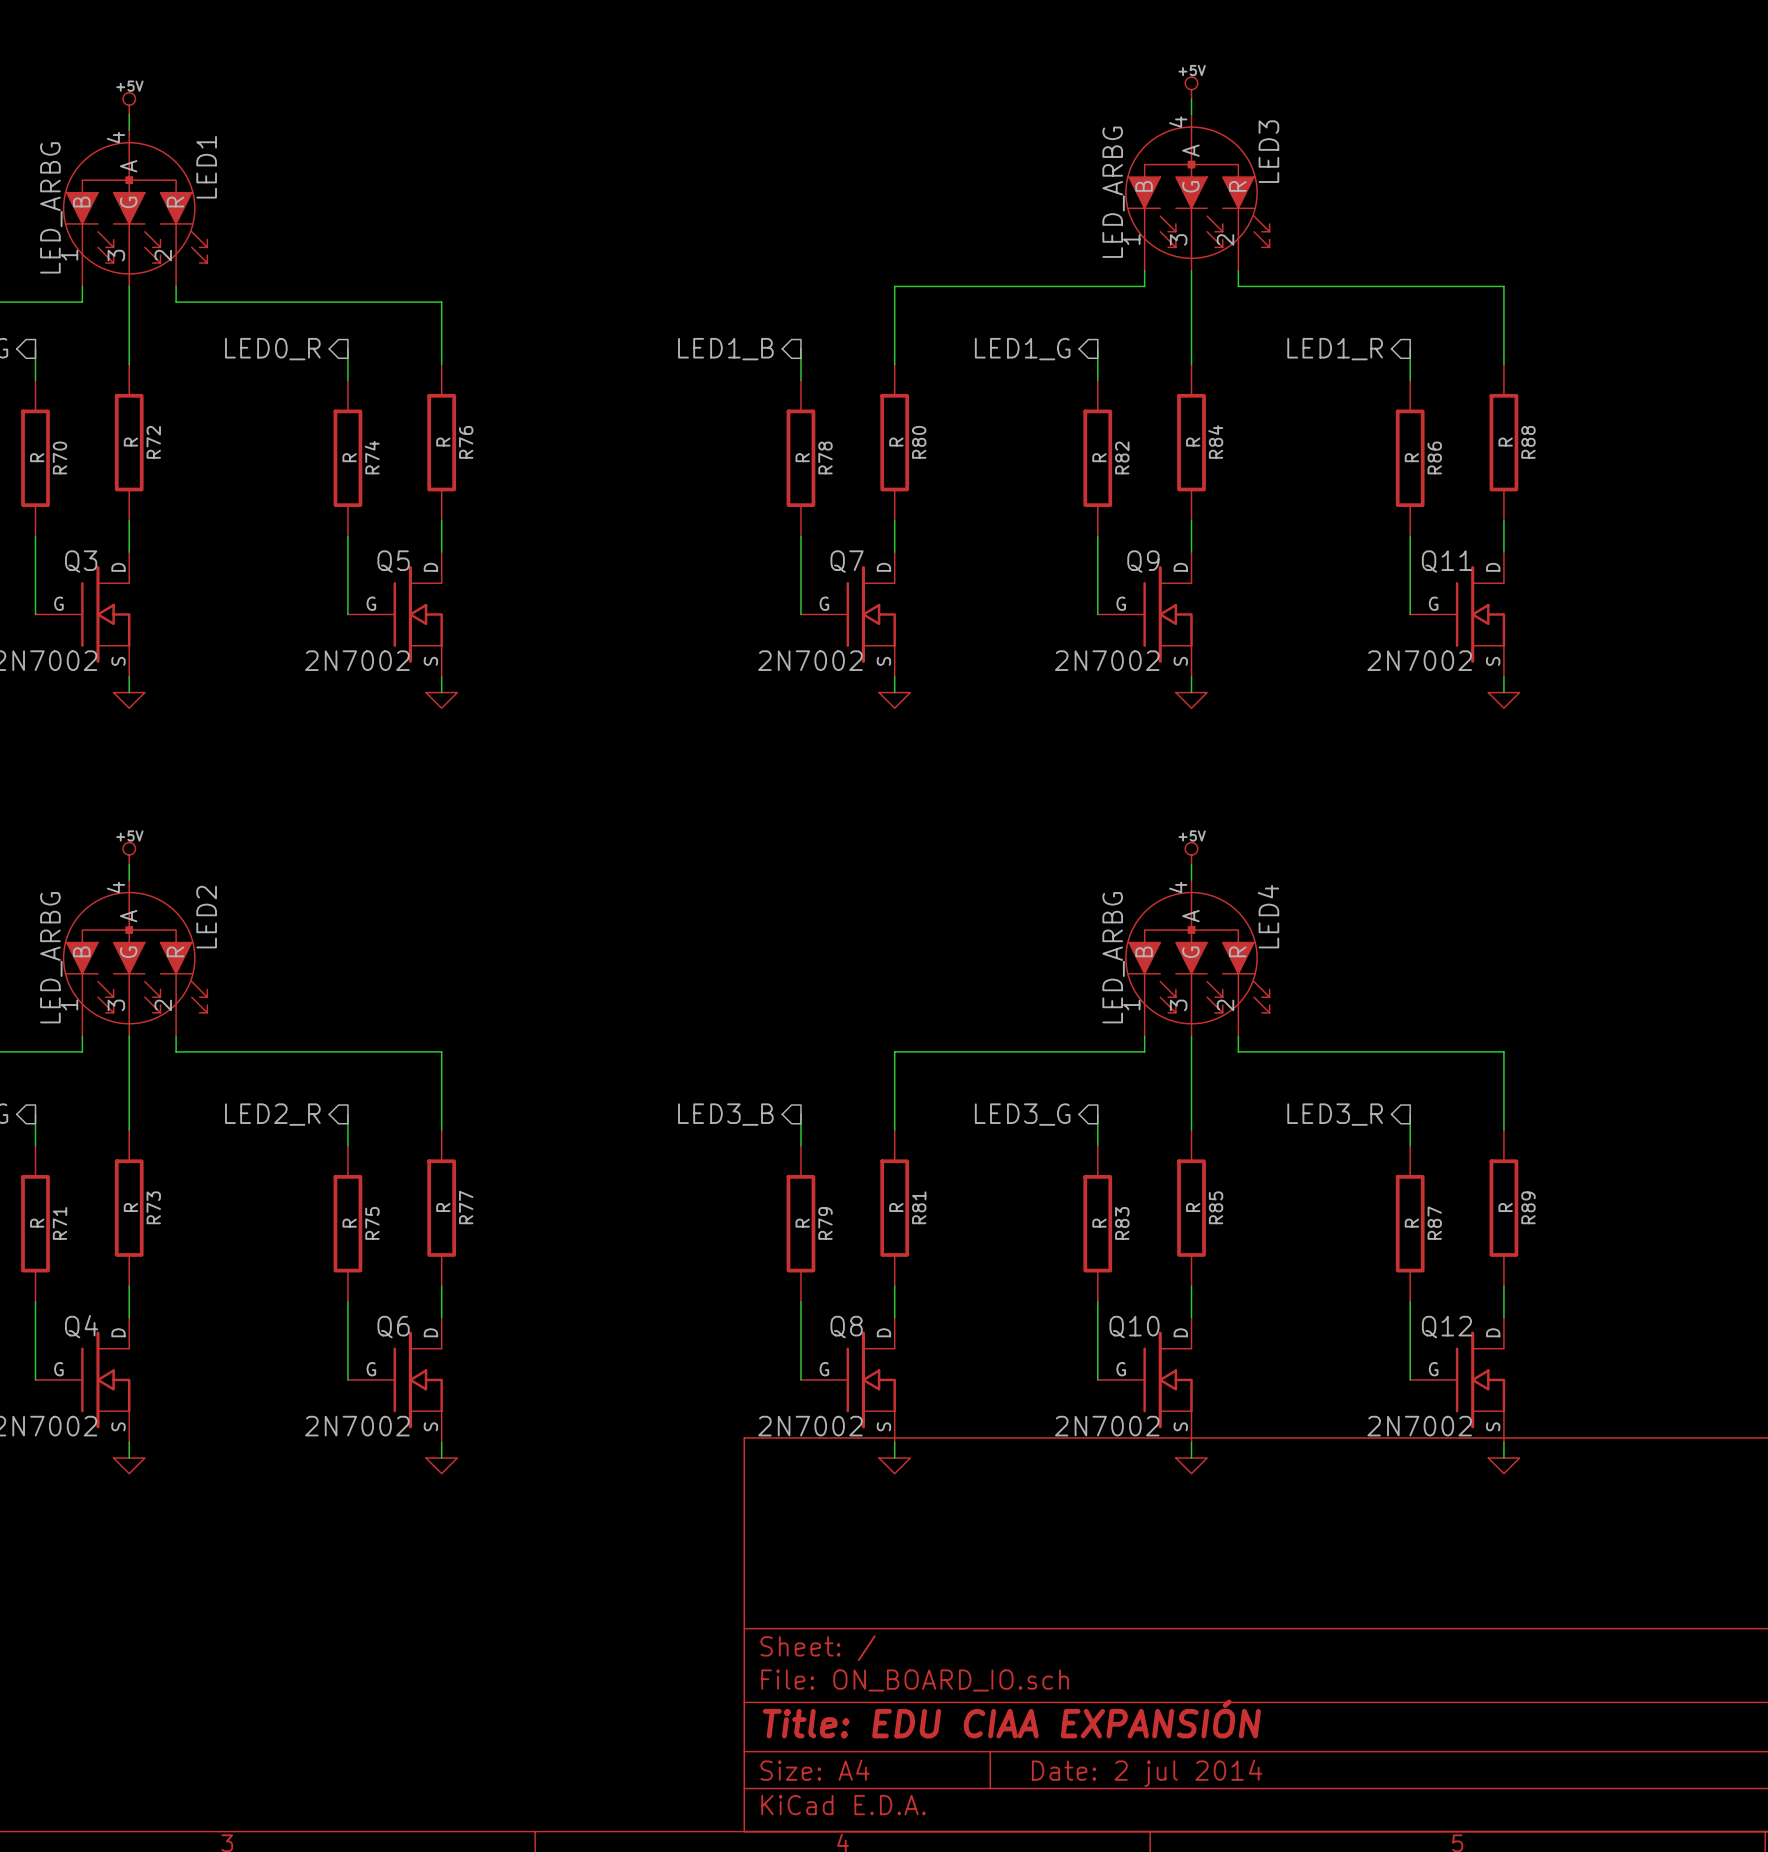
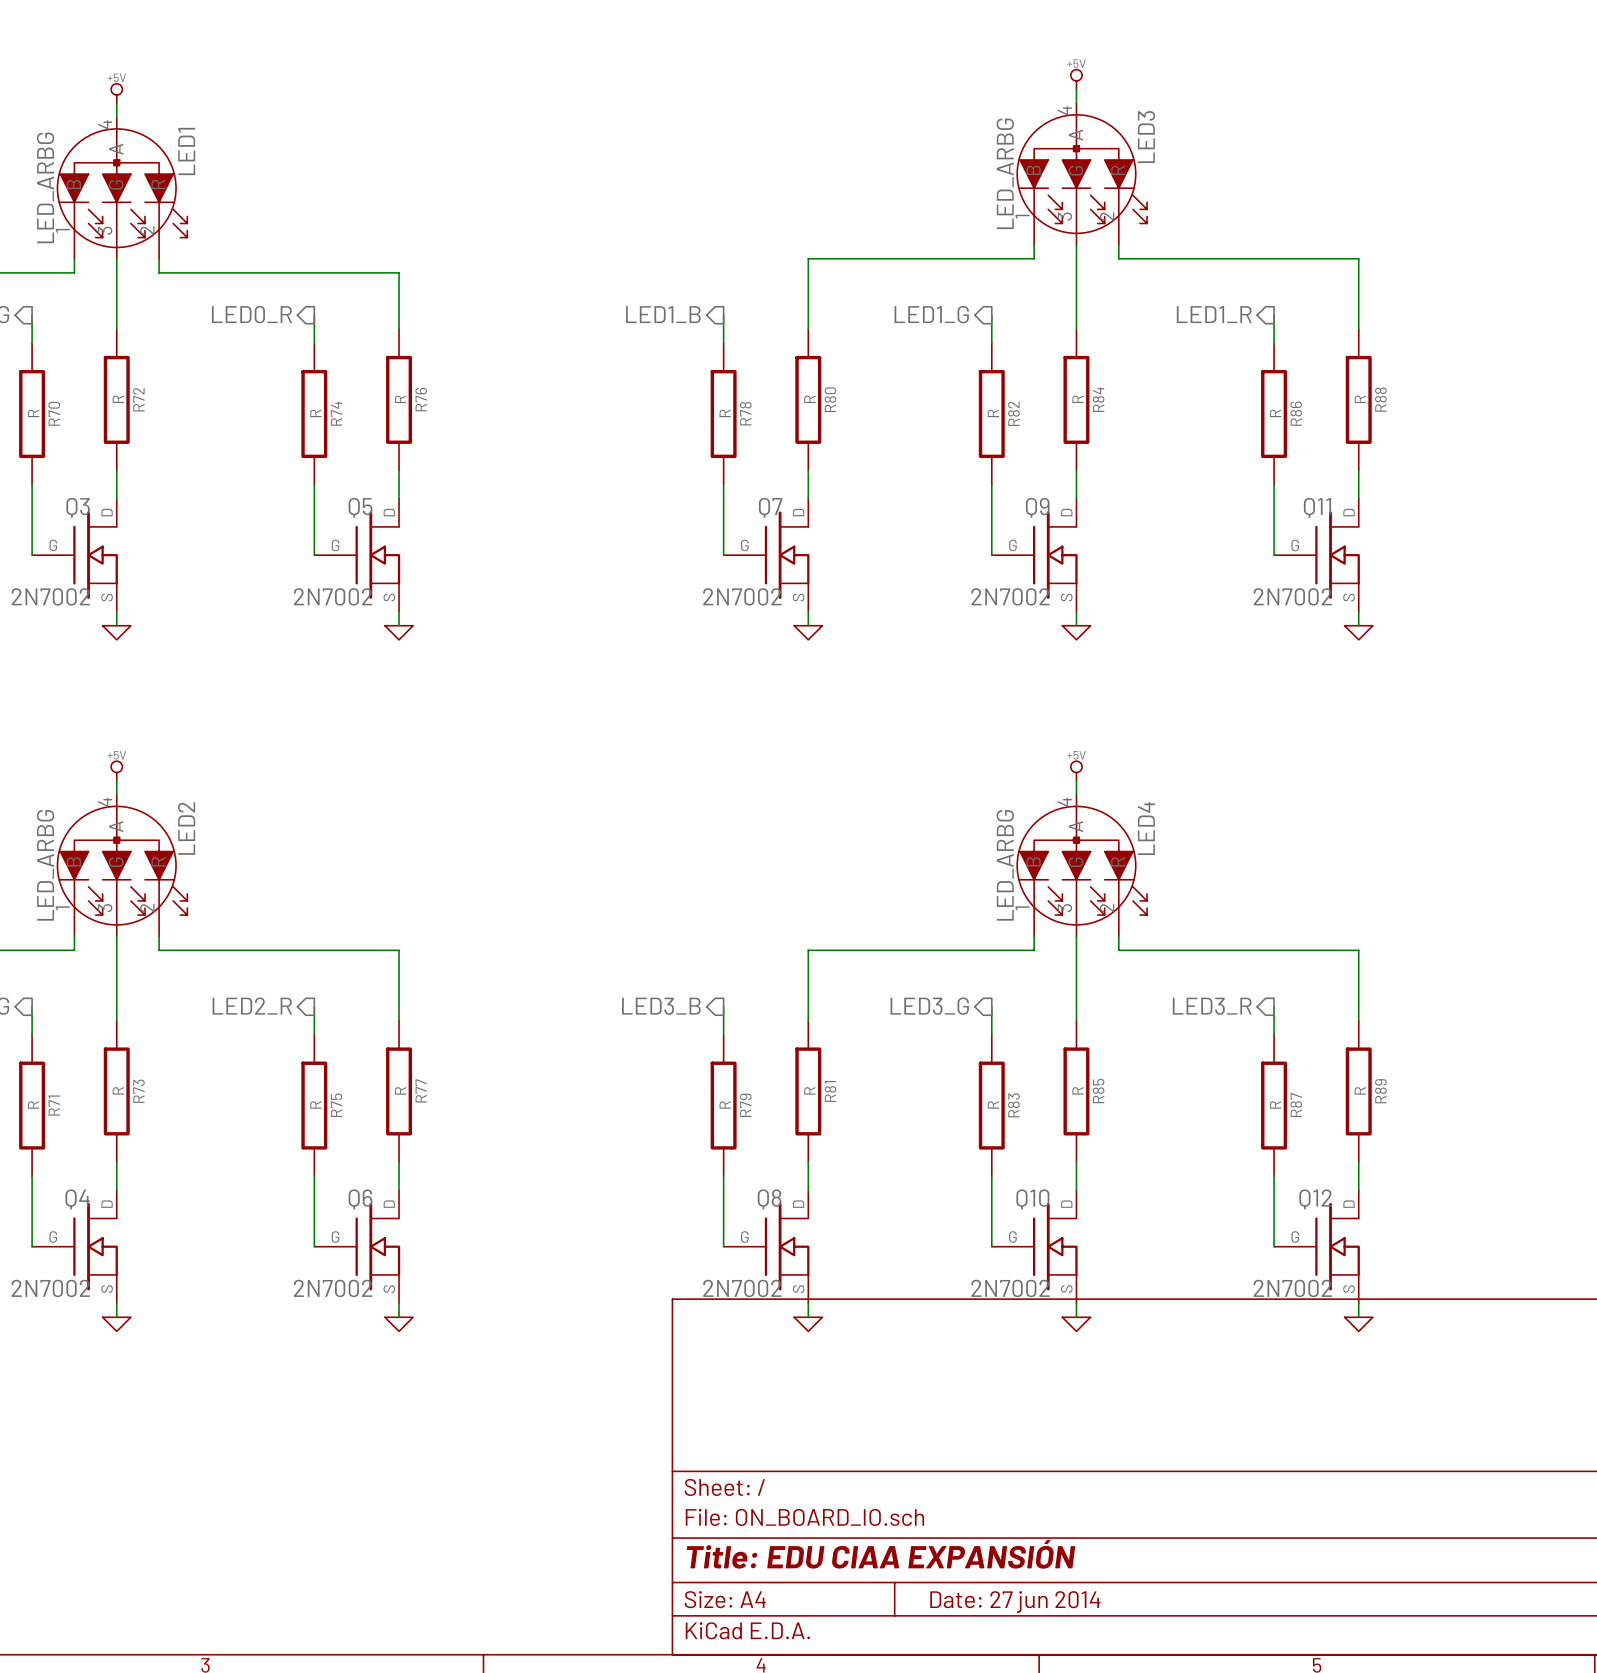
title block: Date: 2 jul 2014 (1147, 1773) -> Date: 27 jun 2014 (1015, 1602)

